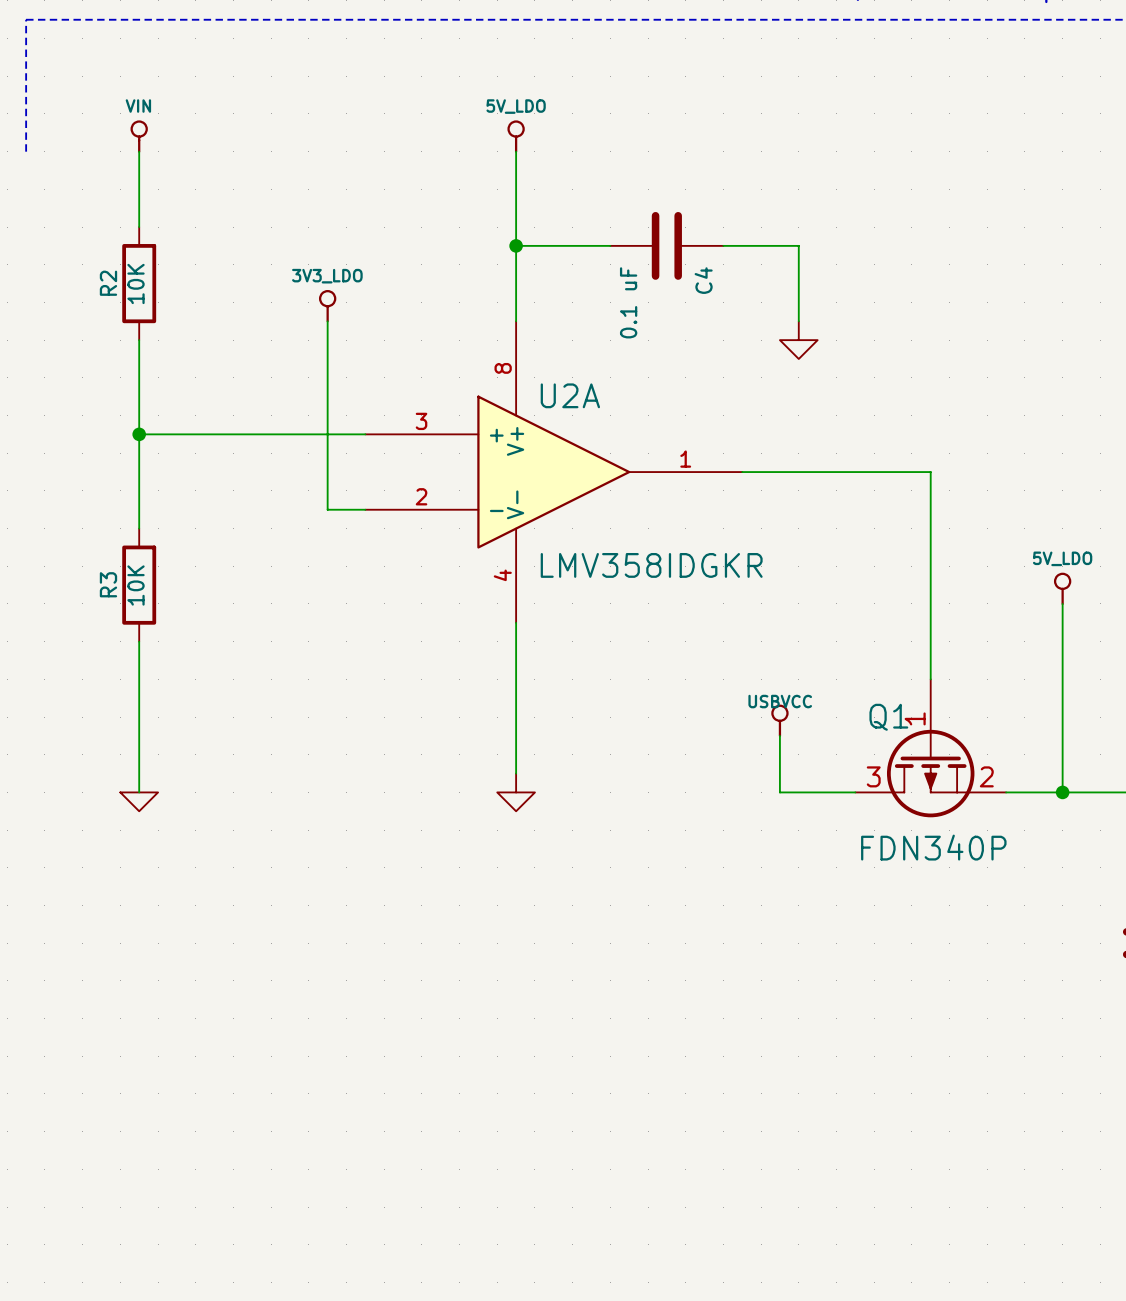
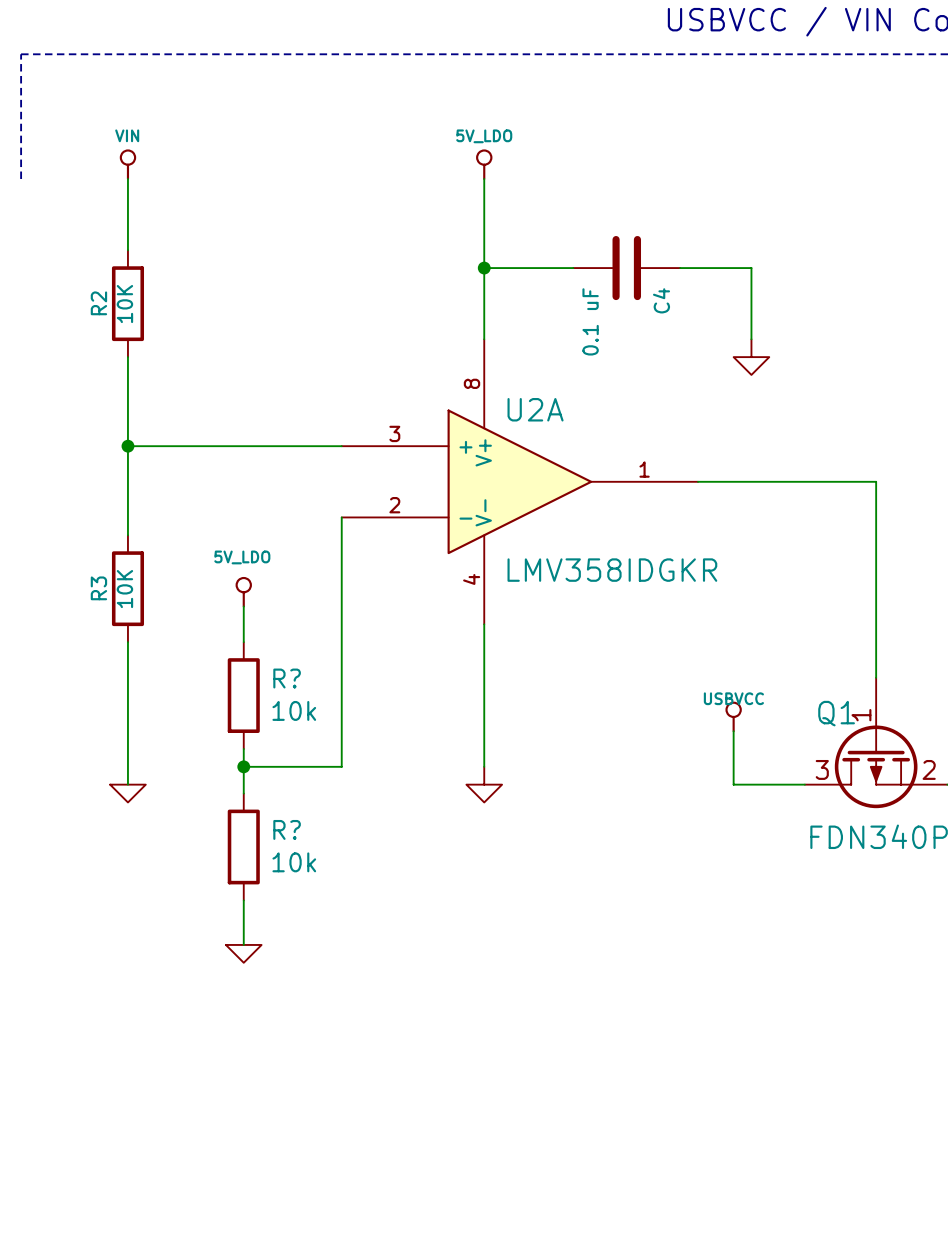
power symbol: 3V3_LDO (327, 306) -> none
wire: (327, 321) (327, 509) (365, 509) -> (243, 766) (341, 766) (341, 517)
power symbol: none -> 5V_LDO (243, 592)
wire: none -> (243, 606) (243, 642)
R?: none -> 10k (243, 695)
wire: none -> (243, 749) (243, 793)
junction: none -> (243, 766)
R?: none -> 10k (243, 846)
wire: none -> (243, 900) (243, 944)
power symbol: none -> (243, 953)

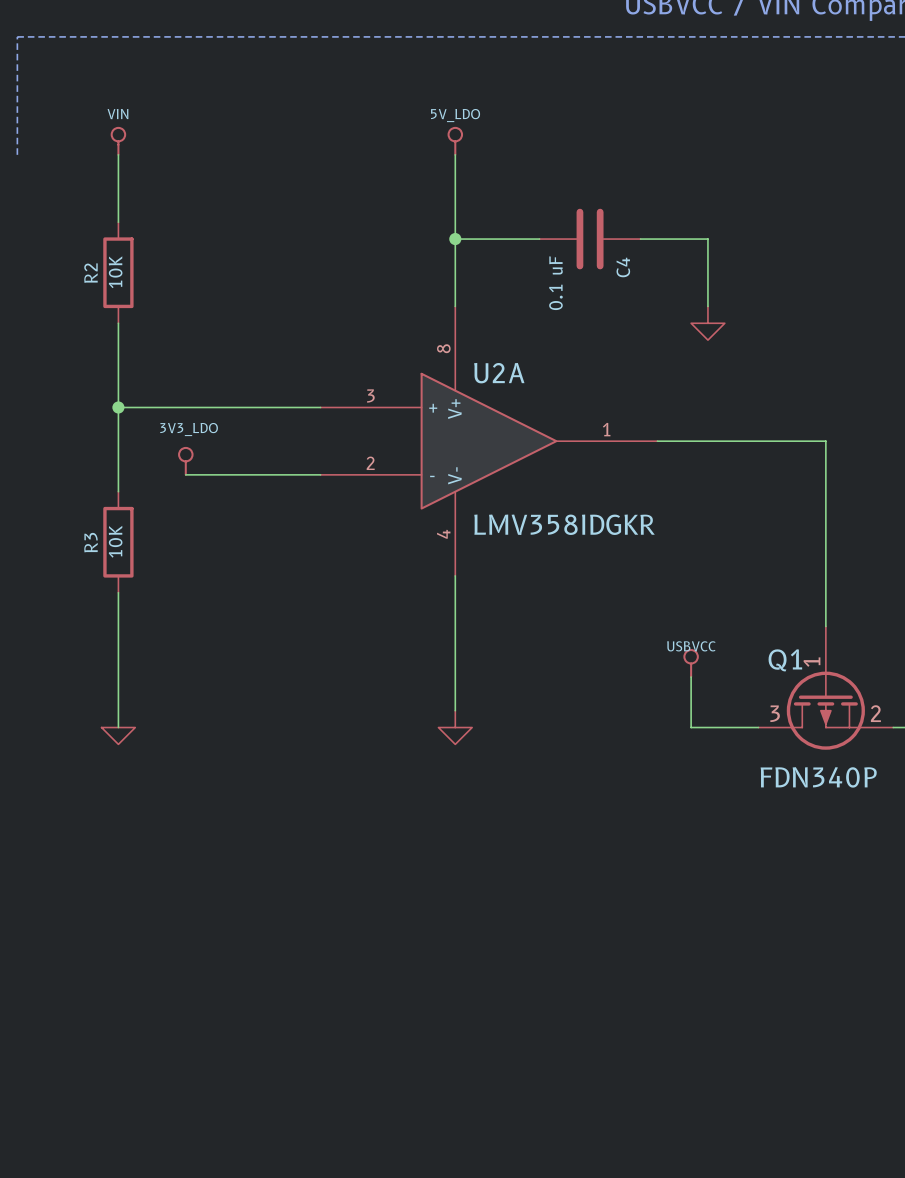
power symbol: none -> 3V3_LDO (185, 461)
wire: (341, 517) (341, 766) (243, 766) -> (320, 474) (185, 474)
power symbol: 5V_LDO (243, 592) -> none
wire: (243, 606) (243, 642) -> none
R?: 10k (243, 695) -> none
wire: (243, 749) (243, 793) -> none
junction: (243, 766) -> none
R?: 10k (243, 846) -> none
wire: (243, 900) (243, 944) -> none
power symbol: (243, 953) -> none

